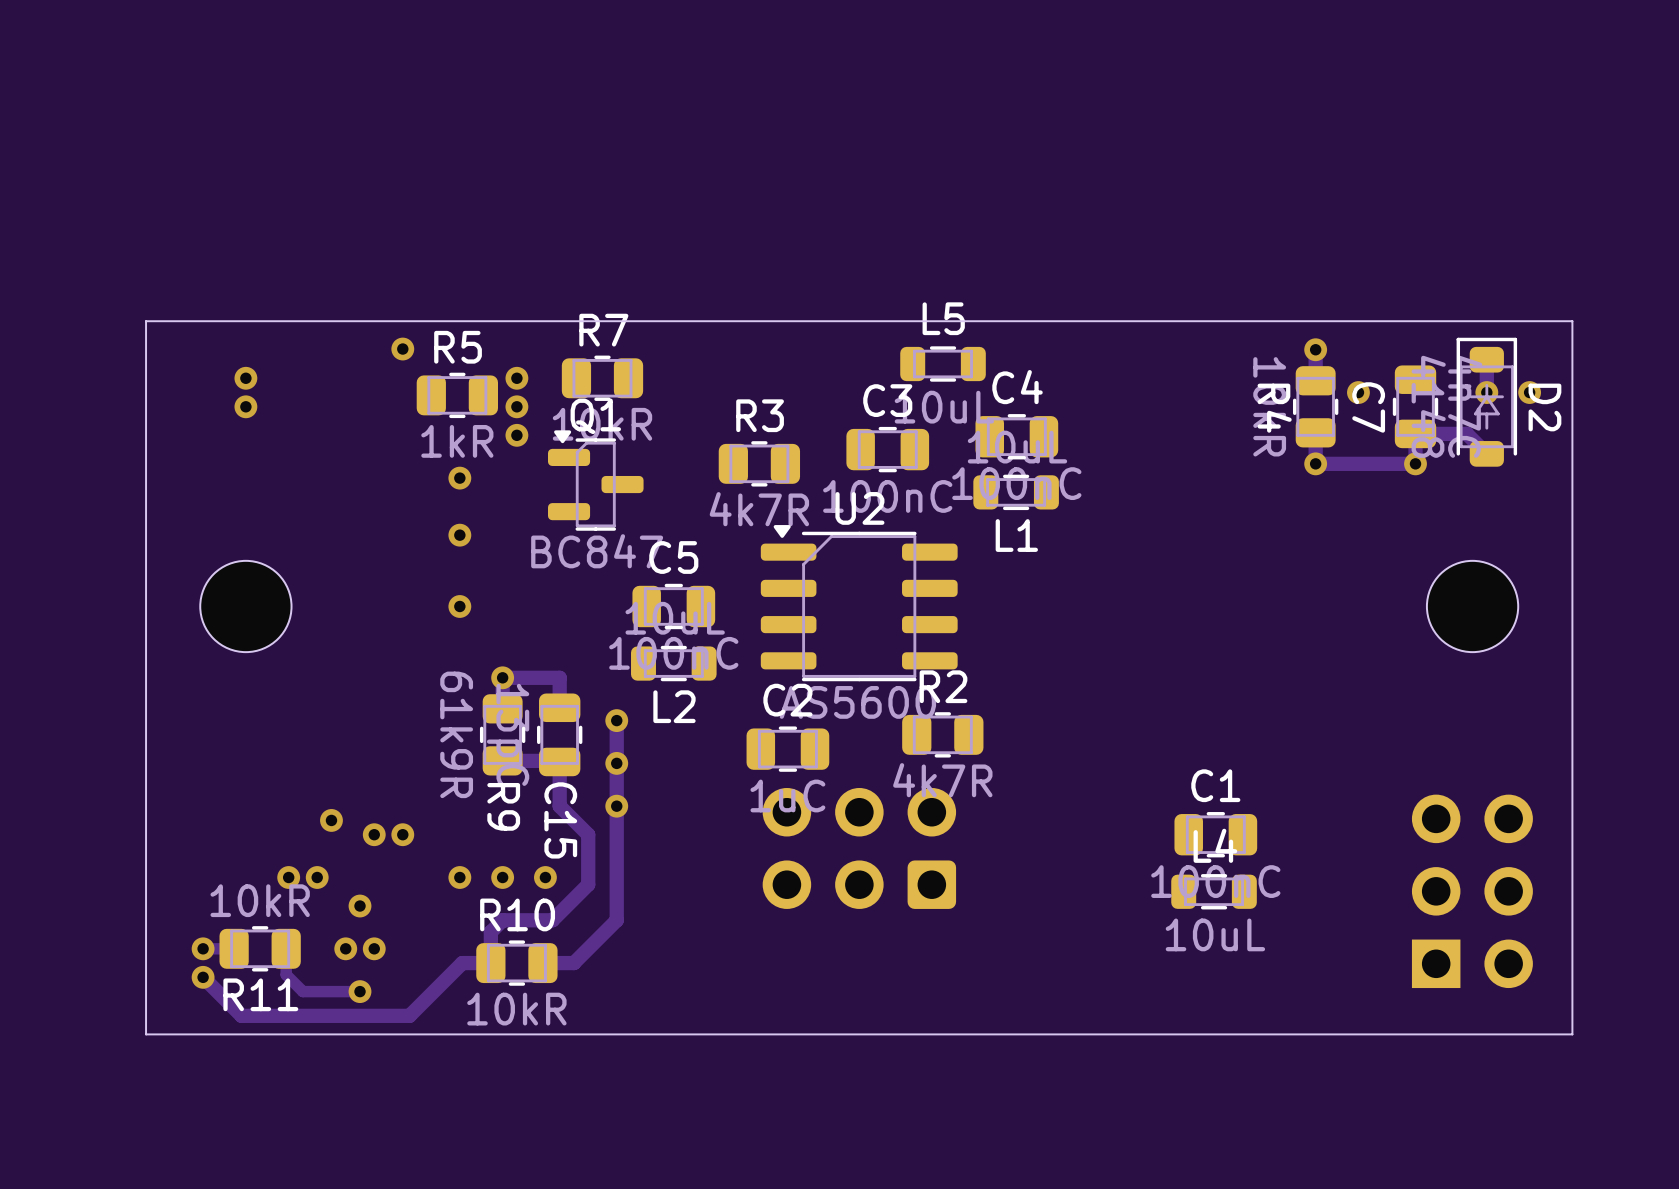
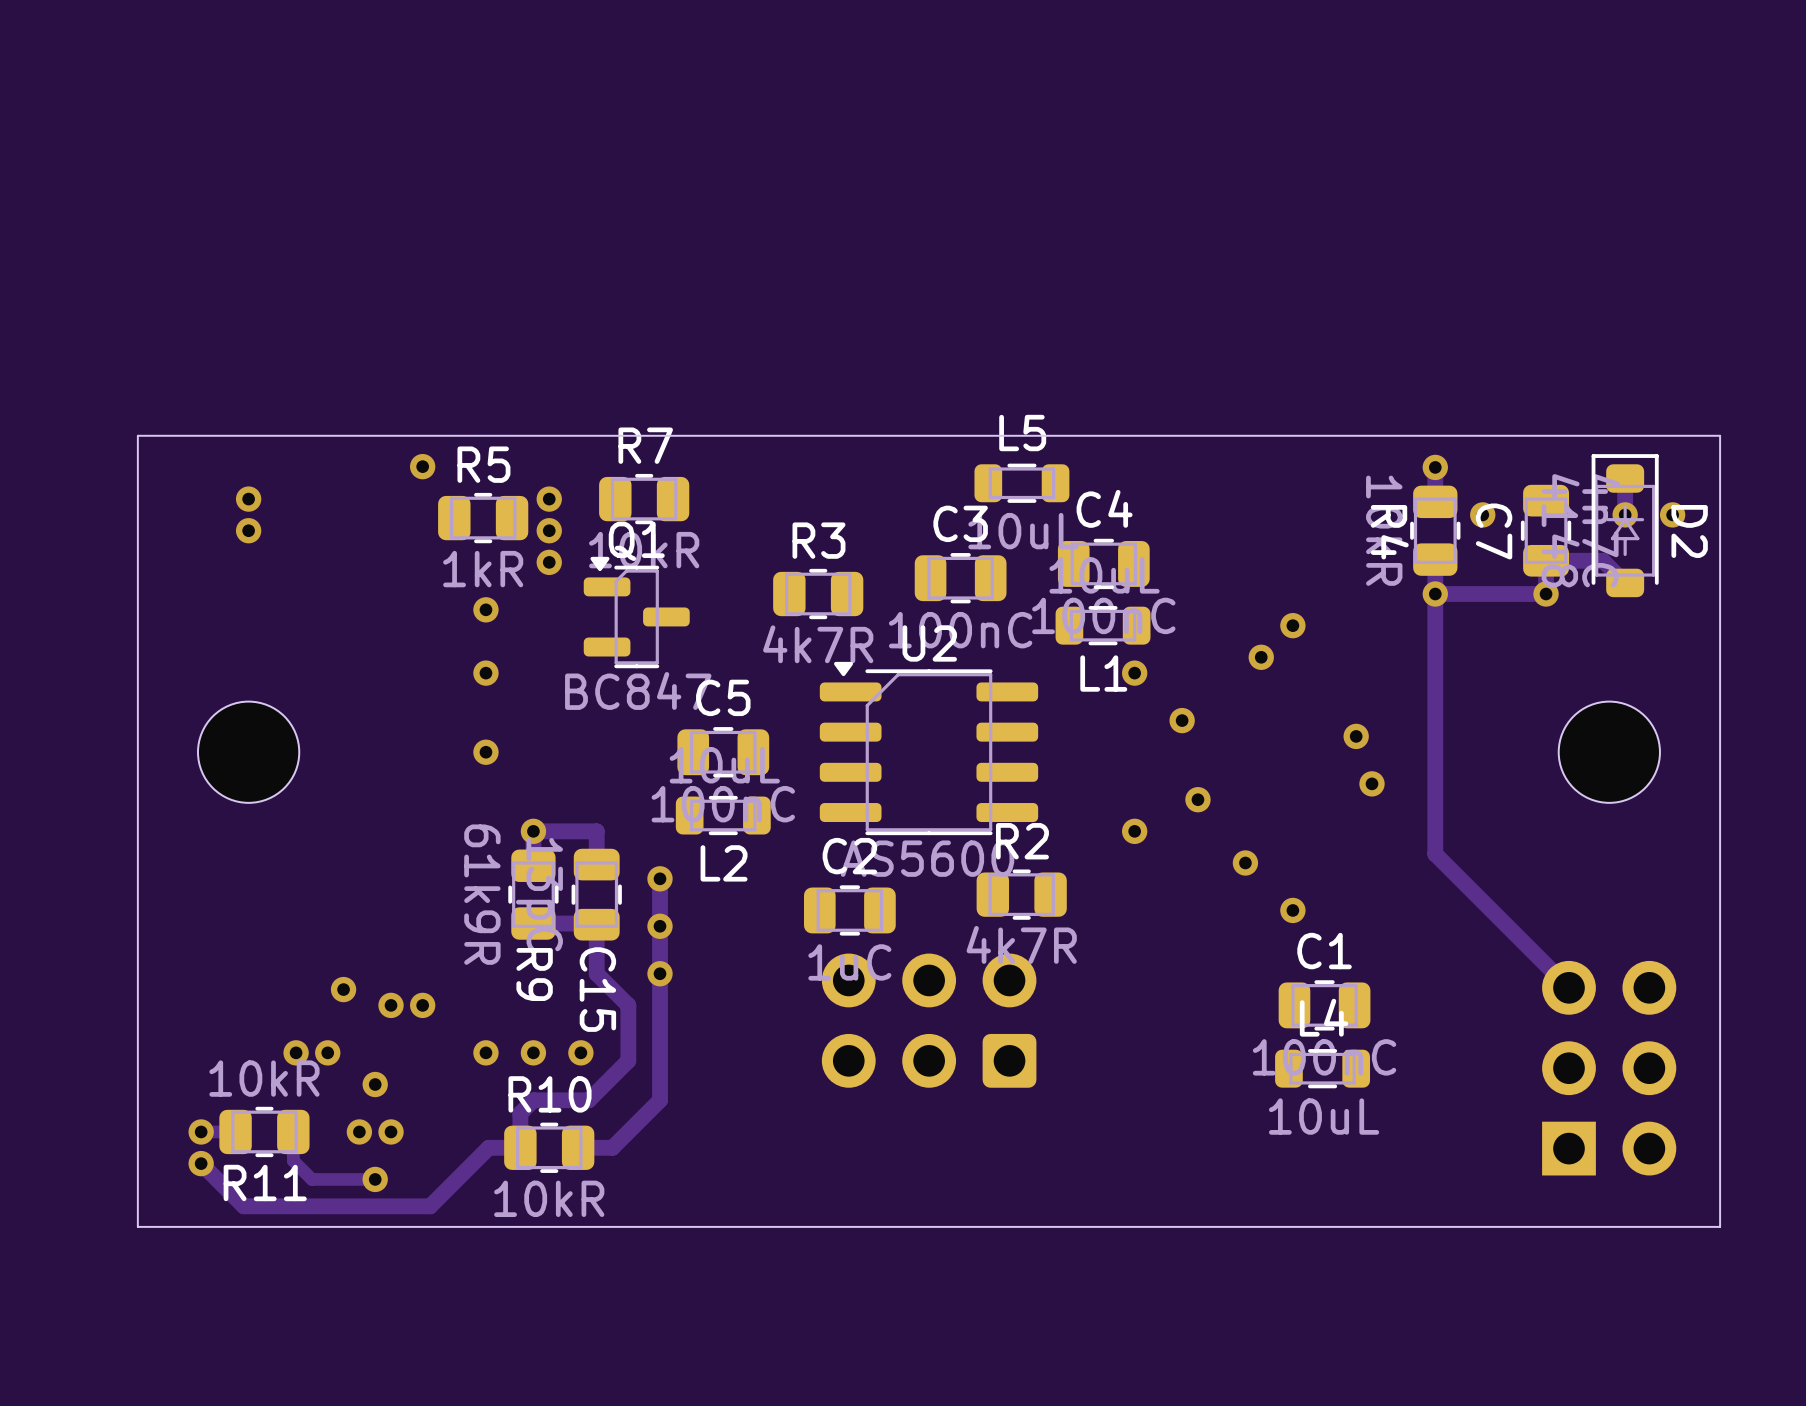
track: none -> (1435, 594) (1435, 854) (1568, 987)
via: none -> (1292, 625)
via: none -> (1261, 657)
via: none -> (1134, 673)
via: none -> (1182, 720)
via: none -> (1356, 736)
via: none -> (1372, 783)
via: none -> (1197, 799)
via: none -> (1134, 831)
via: none -> (1245, 862)
via: none -> (1292, 910)

